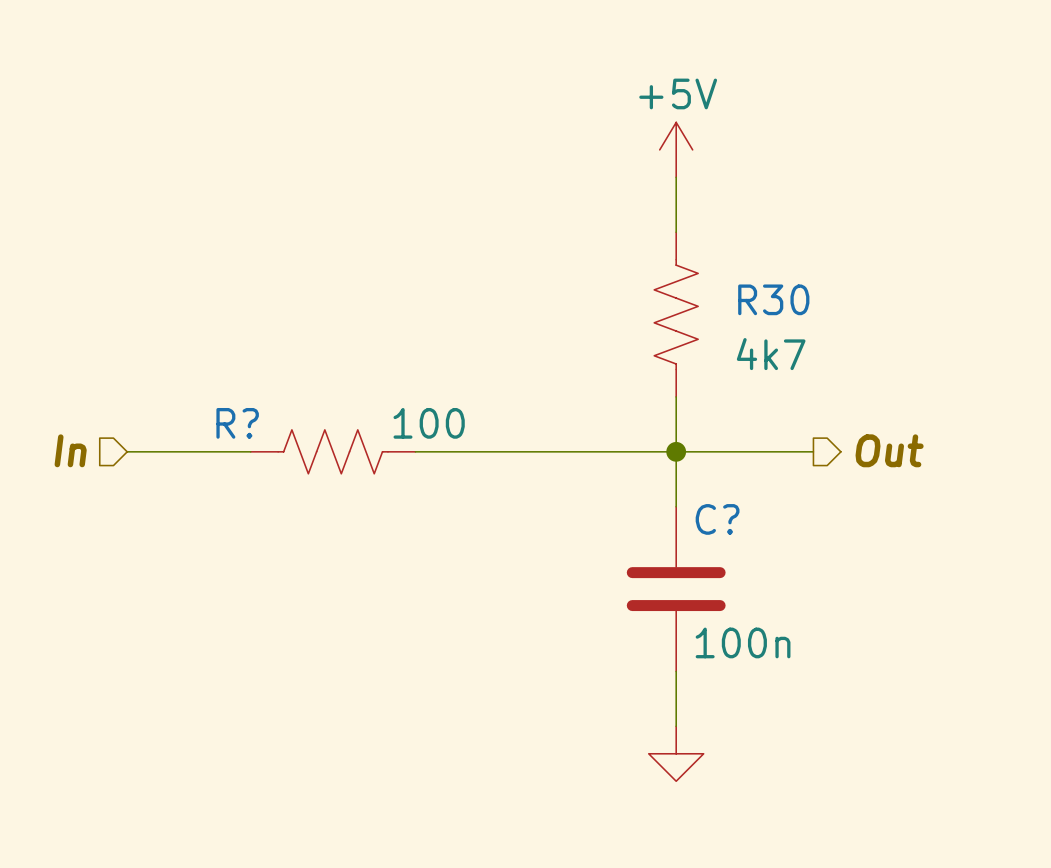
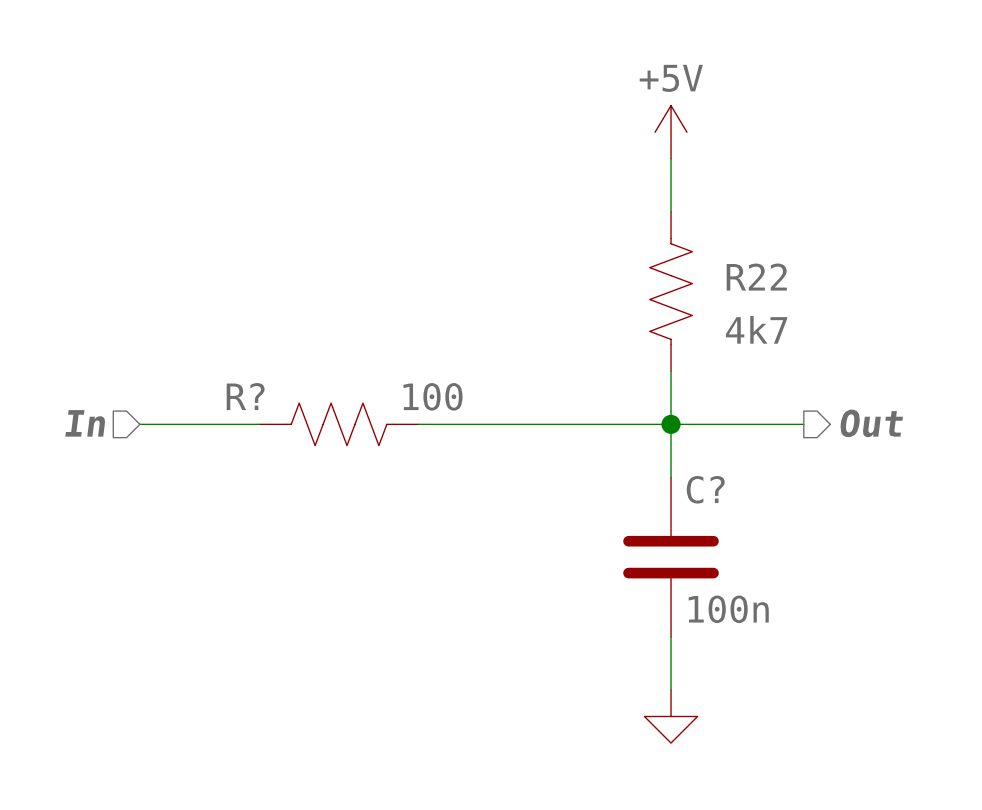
R30 name: R30 (773, 299) -> R22 (756, 277)

